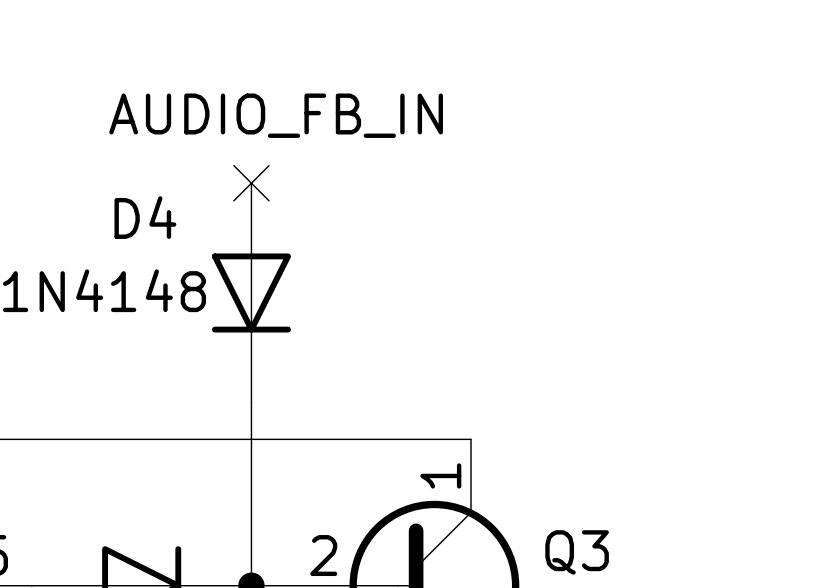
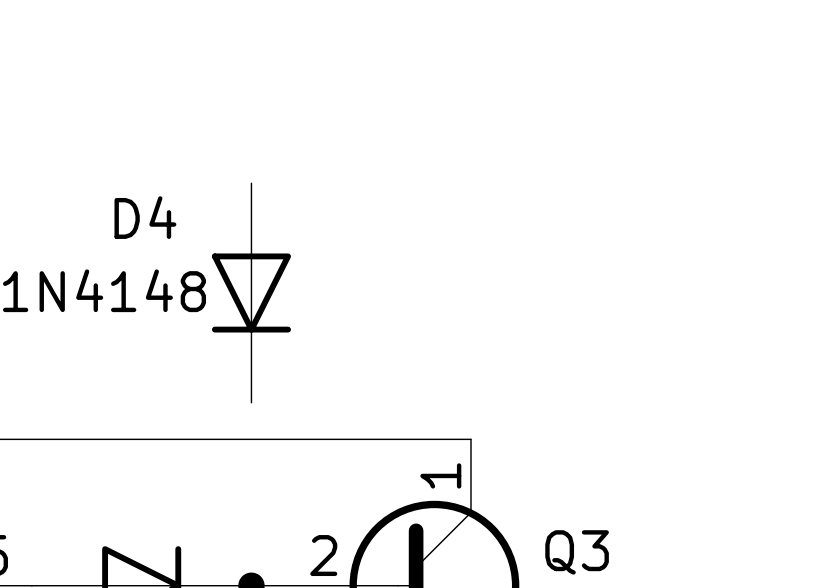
label: AUDIO_FB_IN (276, 115) -> none
no-connect mark: (251, 183) -> none
wire: (251, 402) (251, 585) -> none

